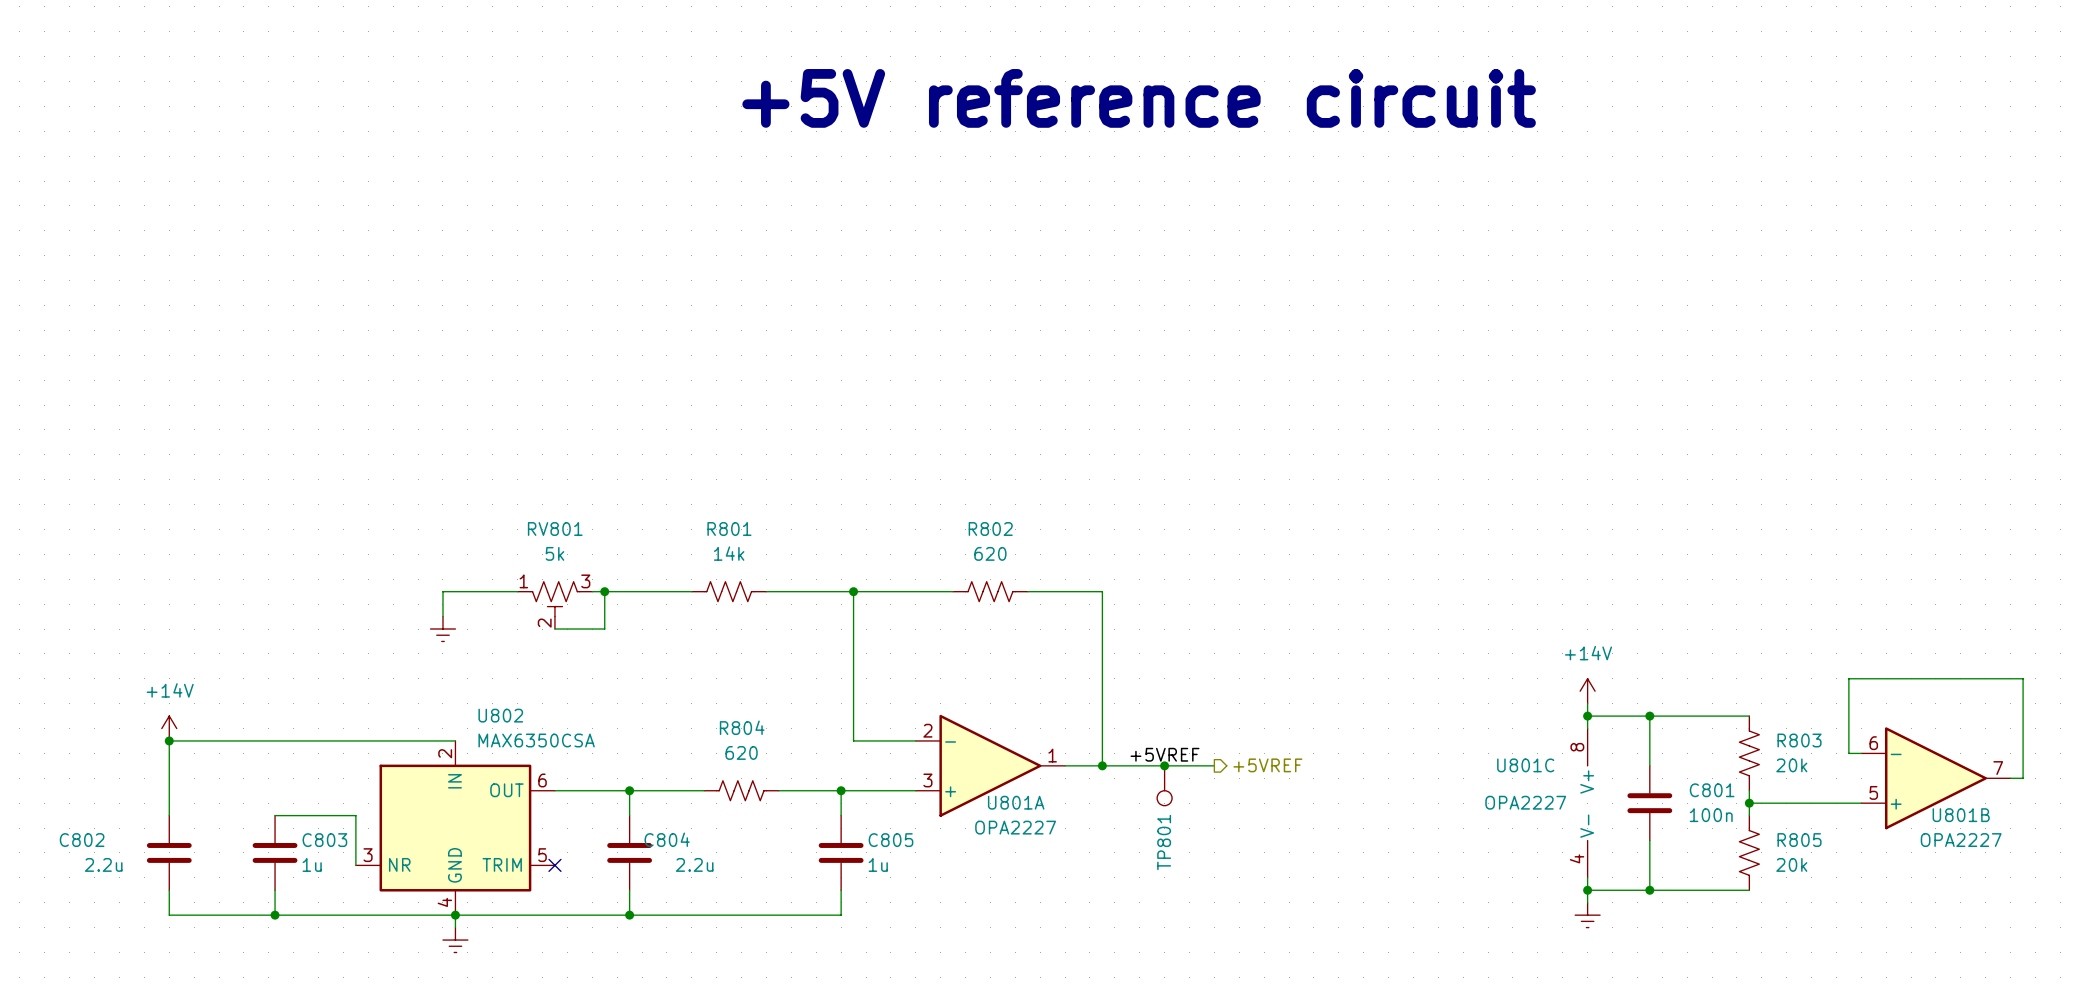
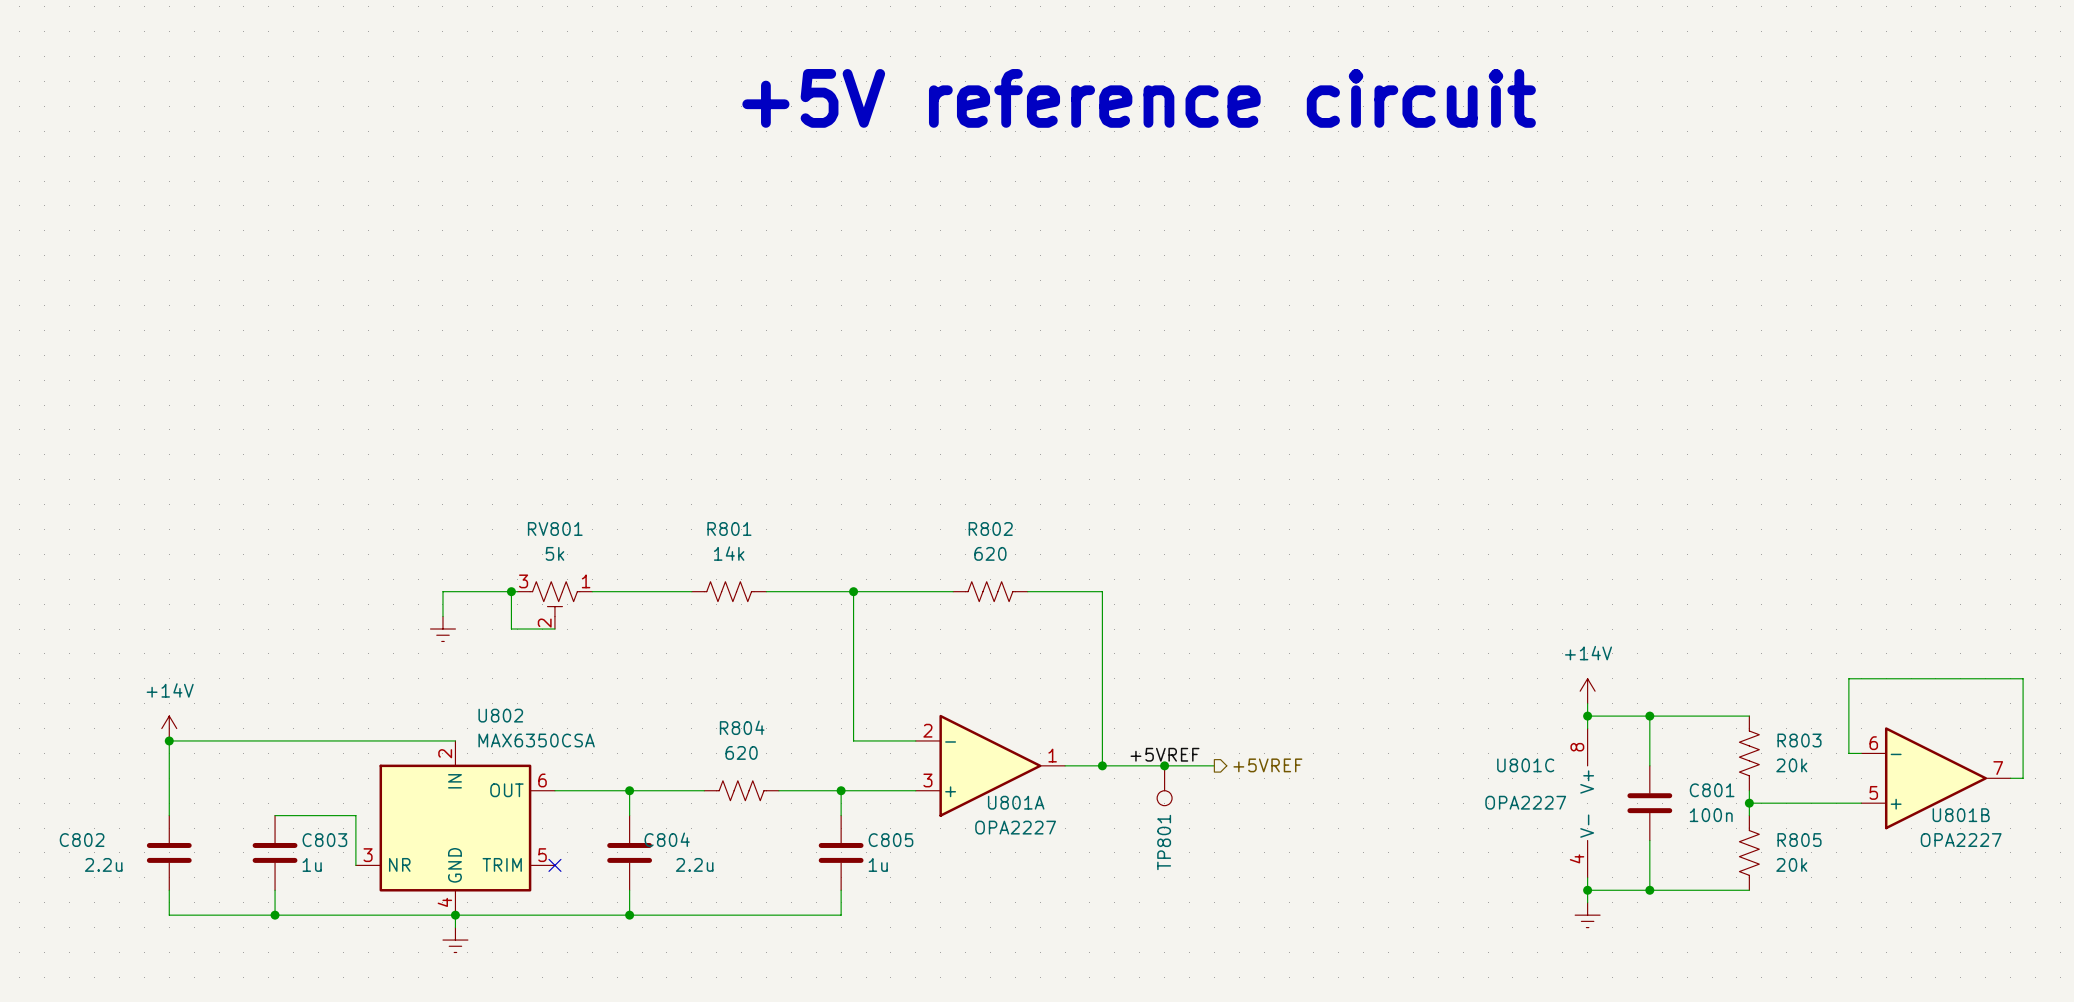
junction: none -> (511, 591)
wire: (604, 591) (604, 629) (554, 629) -> (511, 591) (511, 629) (554, 629)
junction: (604, 591) -> none
RV801 flip: as is (554, 599) -> left-right (554, 599)

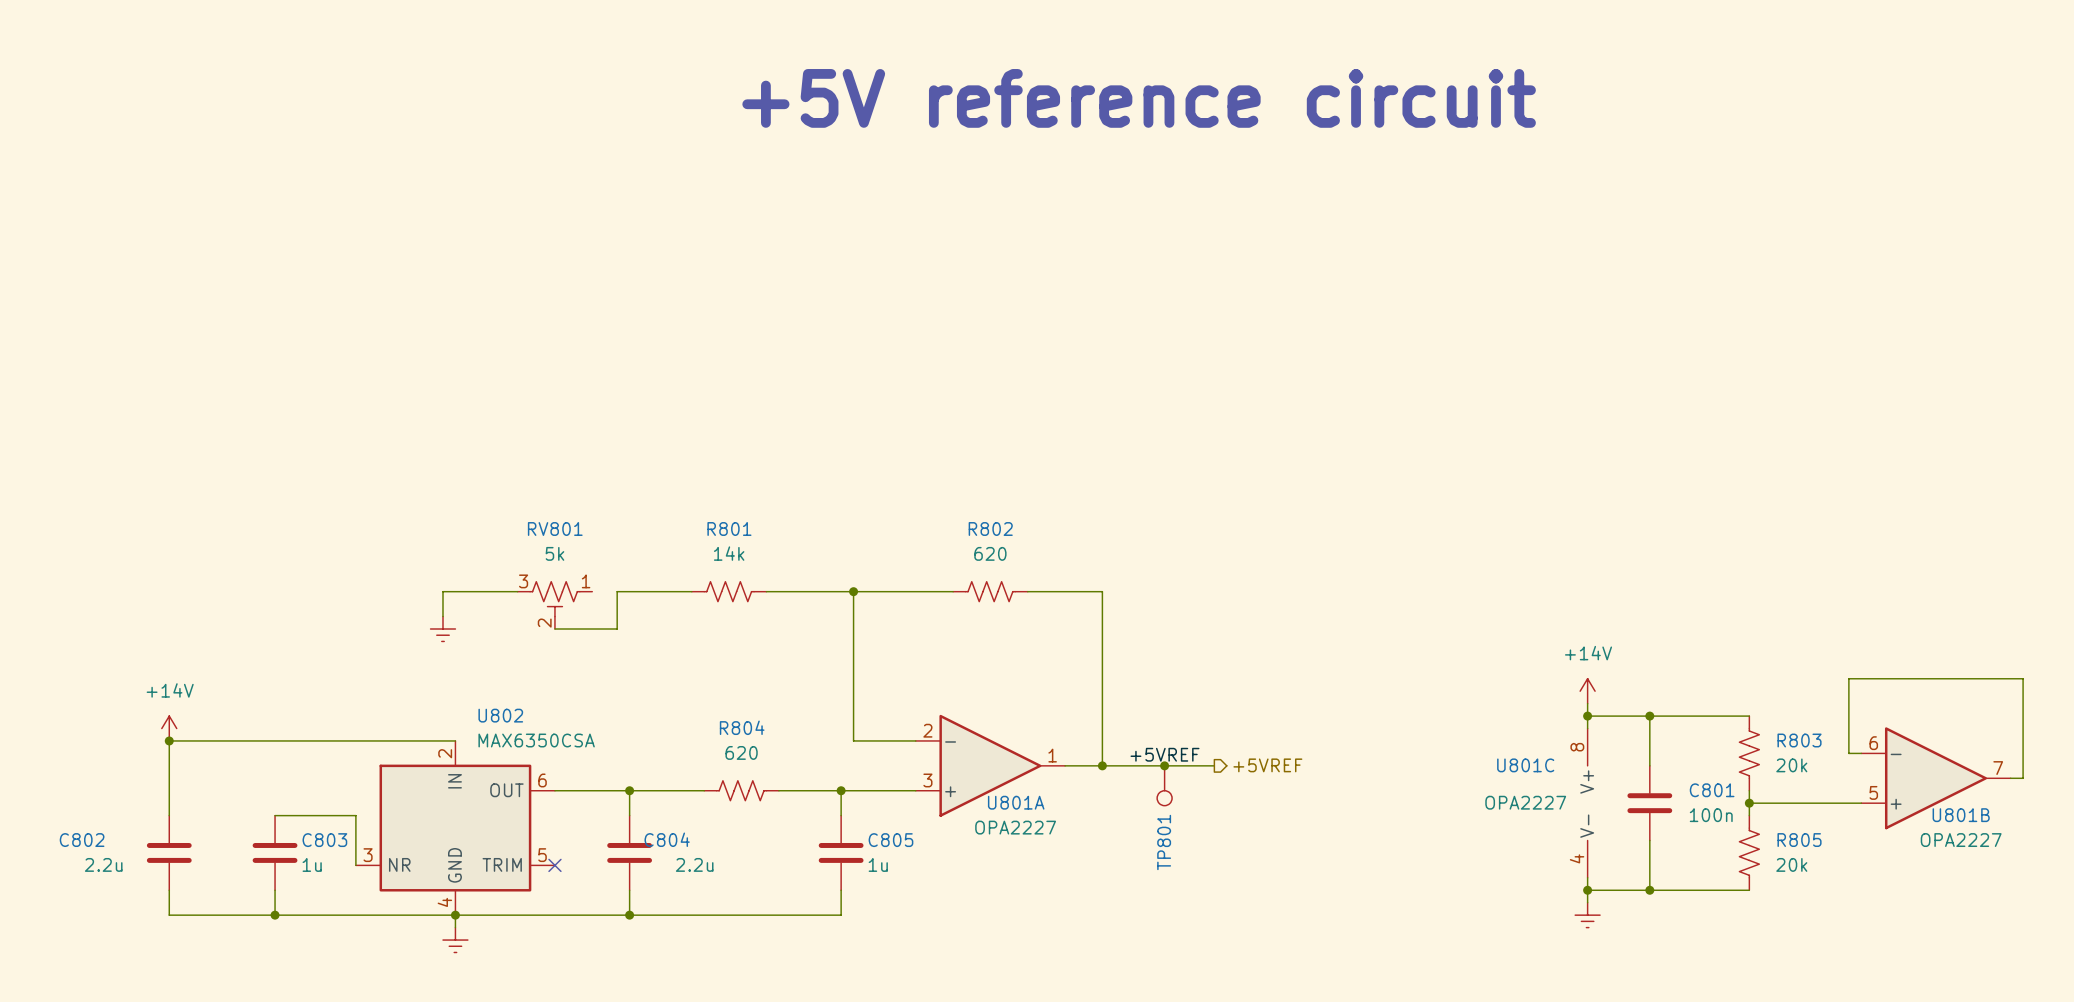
wire: (511, 591) (511, 629) (554, 629) -> none
junction: (511, 591) -> none
wire: (592, 591) (617, 591) -> (554, 629) (617, 629) (617, 591)

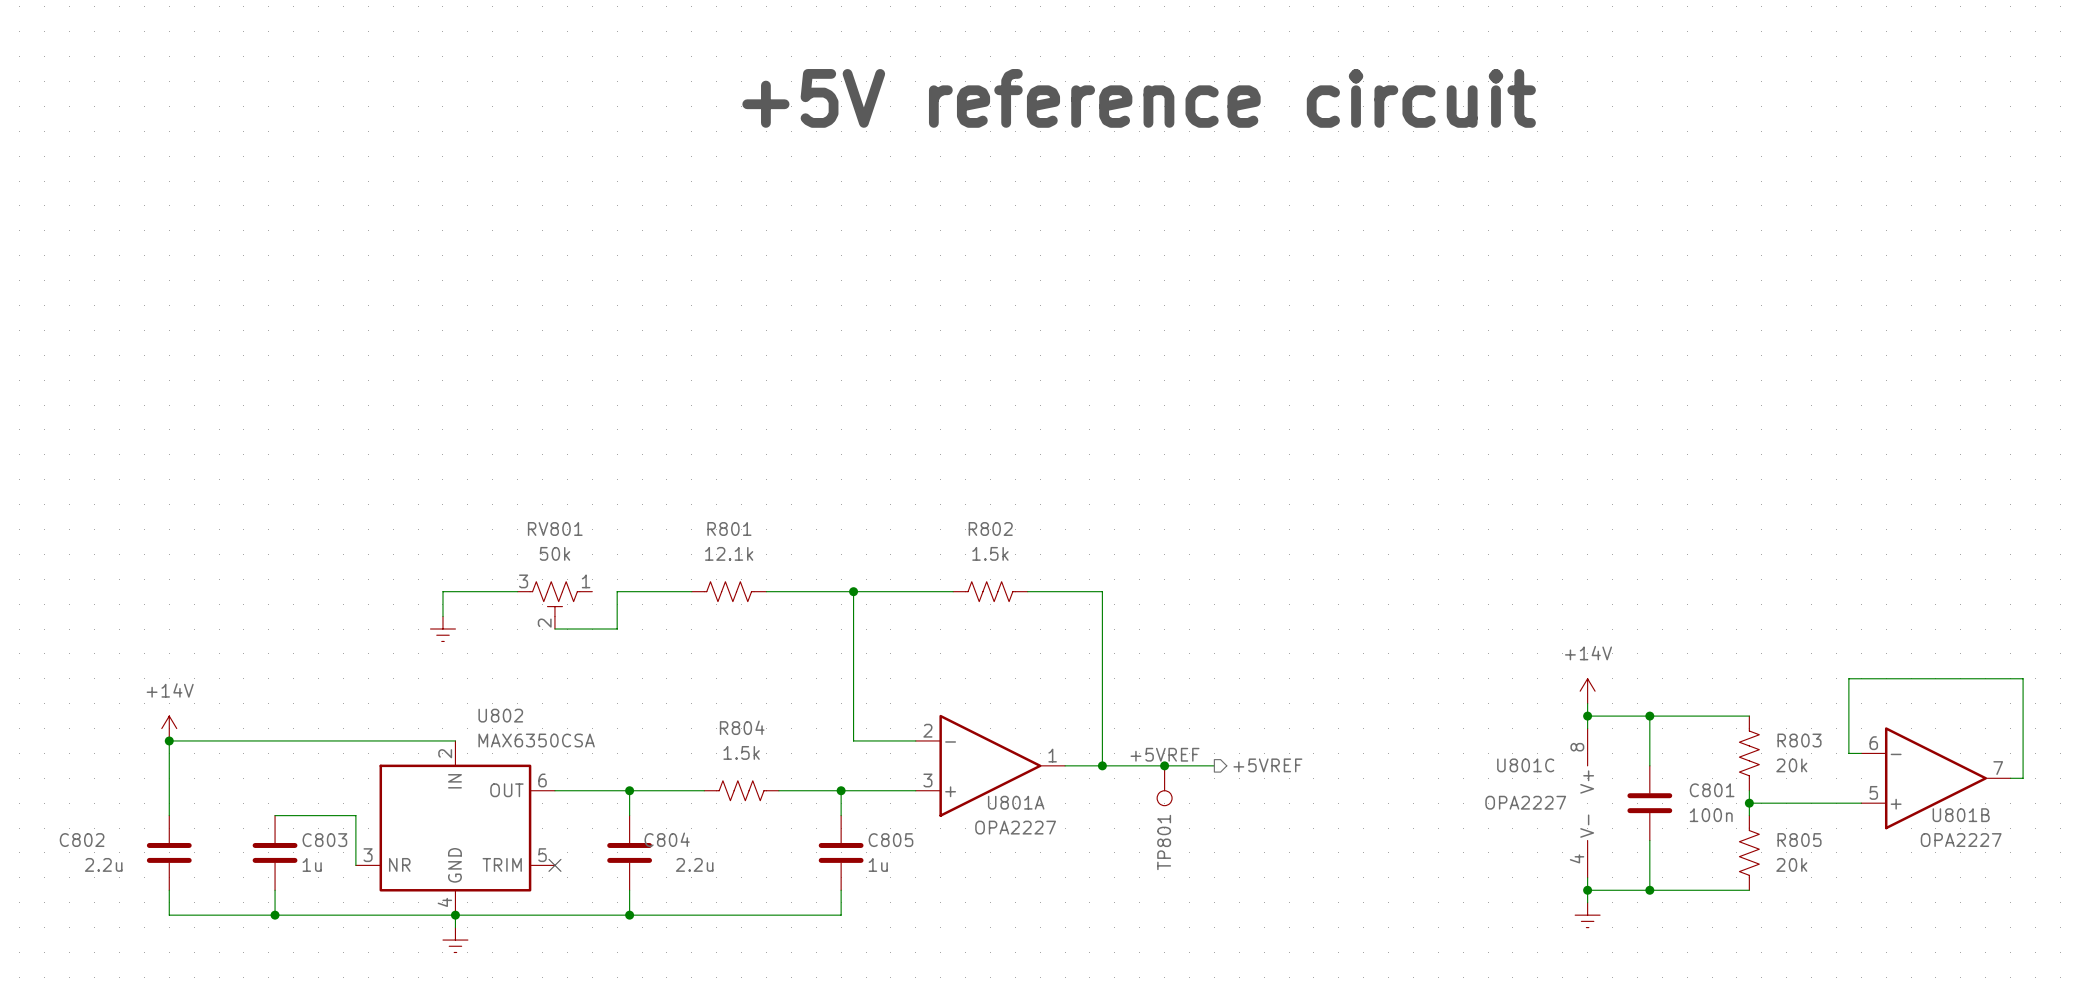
RV801 value: 5k (554, 553) -> 50k (554, 553)
R801 value: 14k (729, 553) -> 12.1k (729, 553)
R802 value: 620 (990, 553) -> 1.5k (990, 553)
R804 value: 620 (741, 752) -> 1.5k (741, 752)

